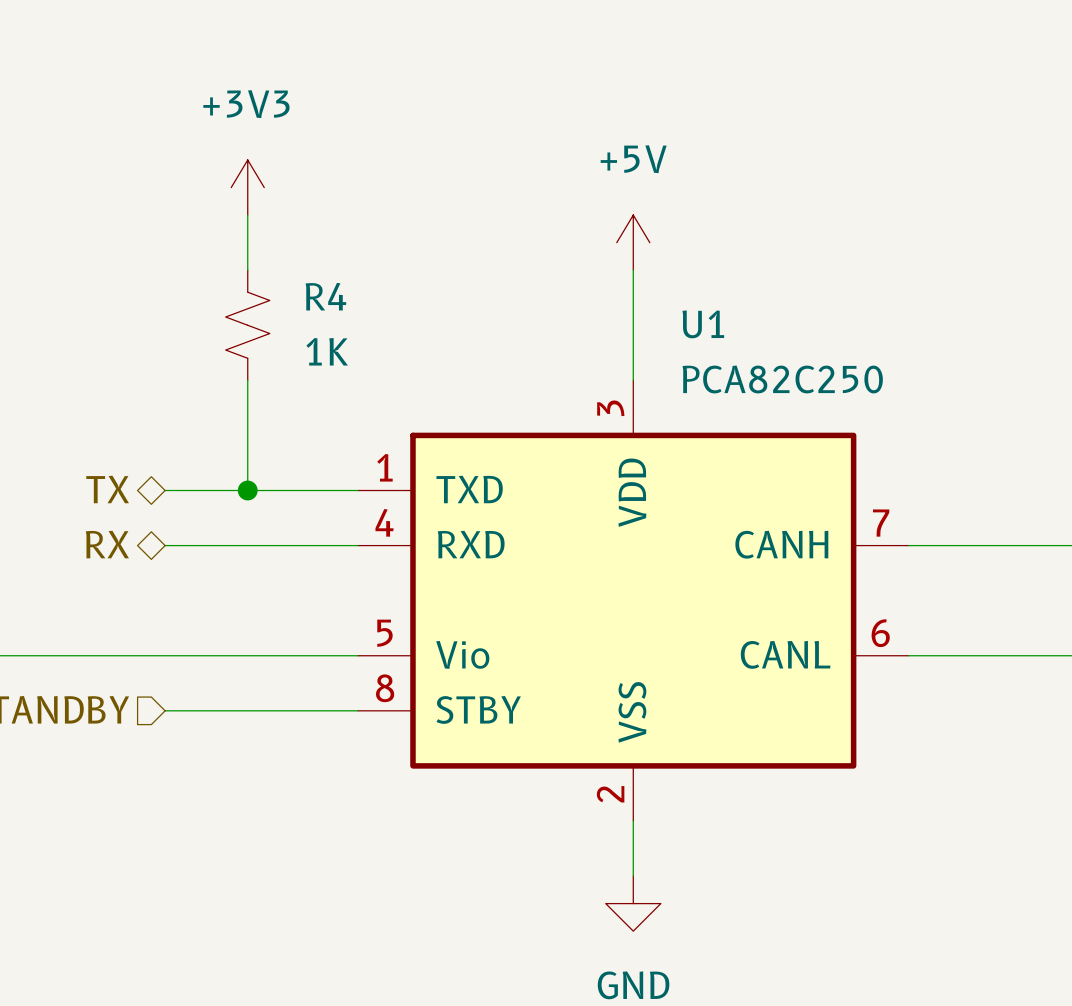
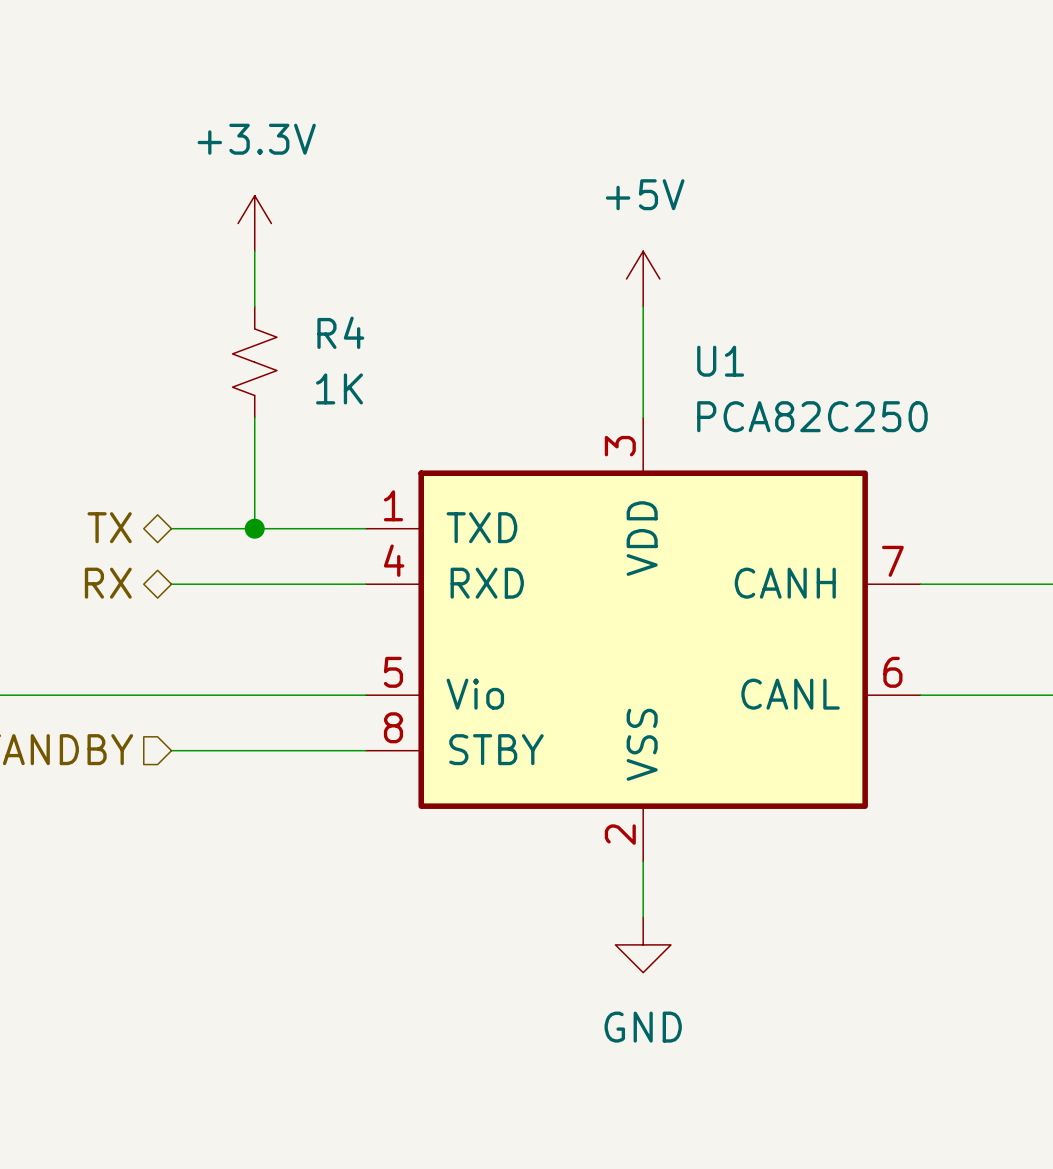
power symbol: +3V3 (247, 187) -> +3.3V (254, 223)

